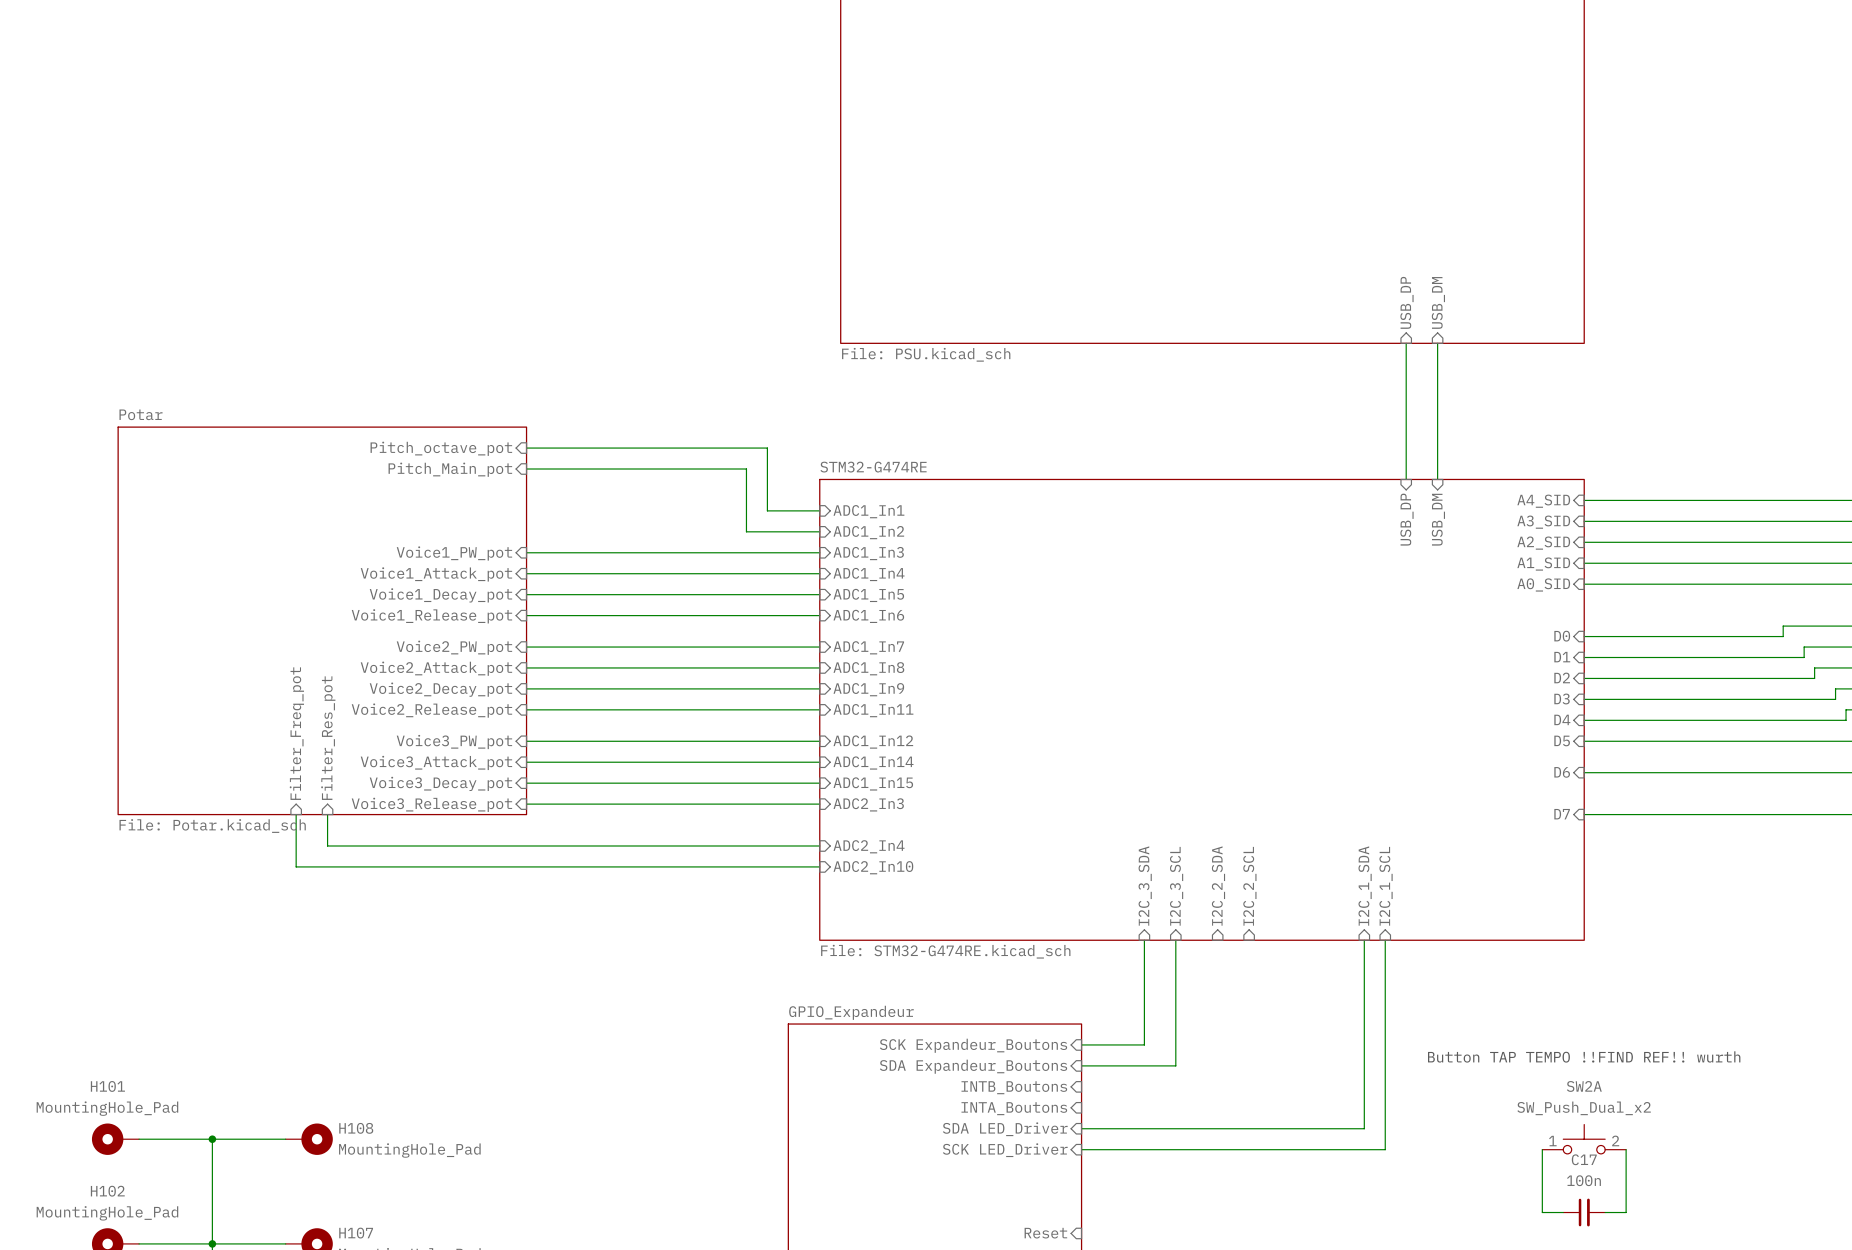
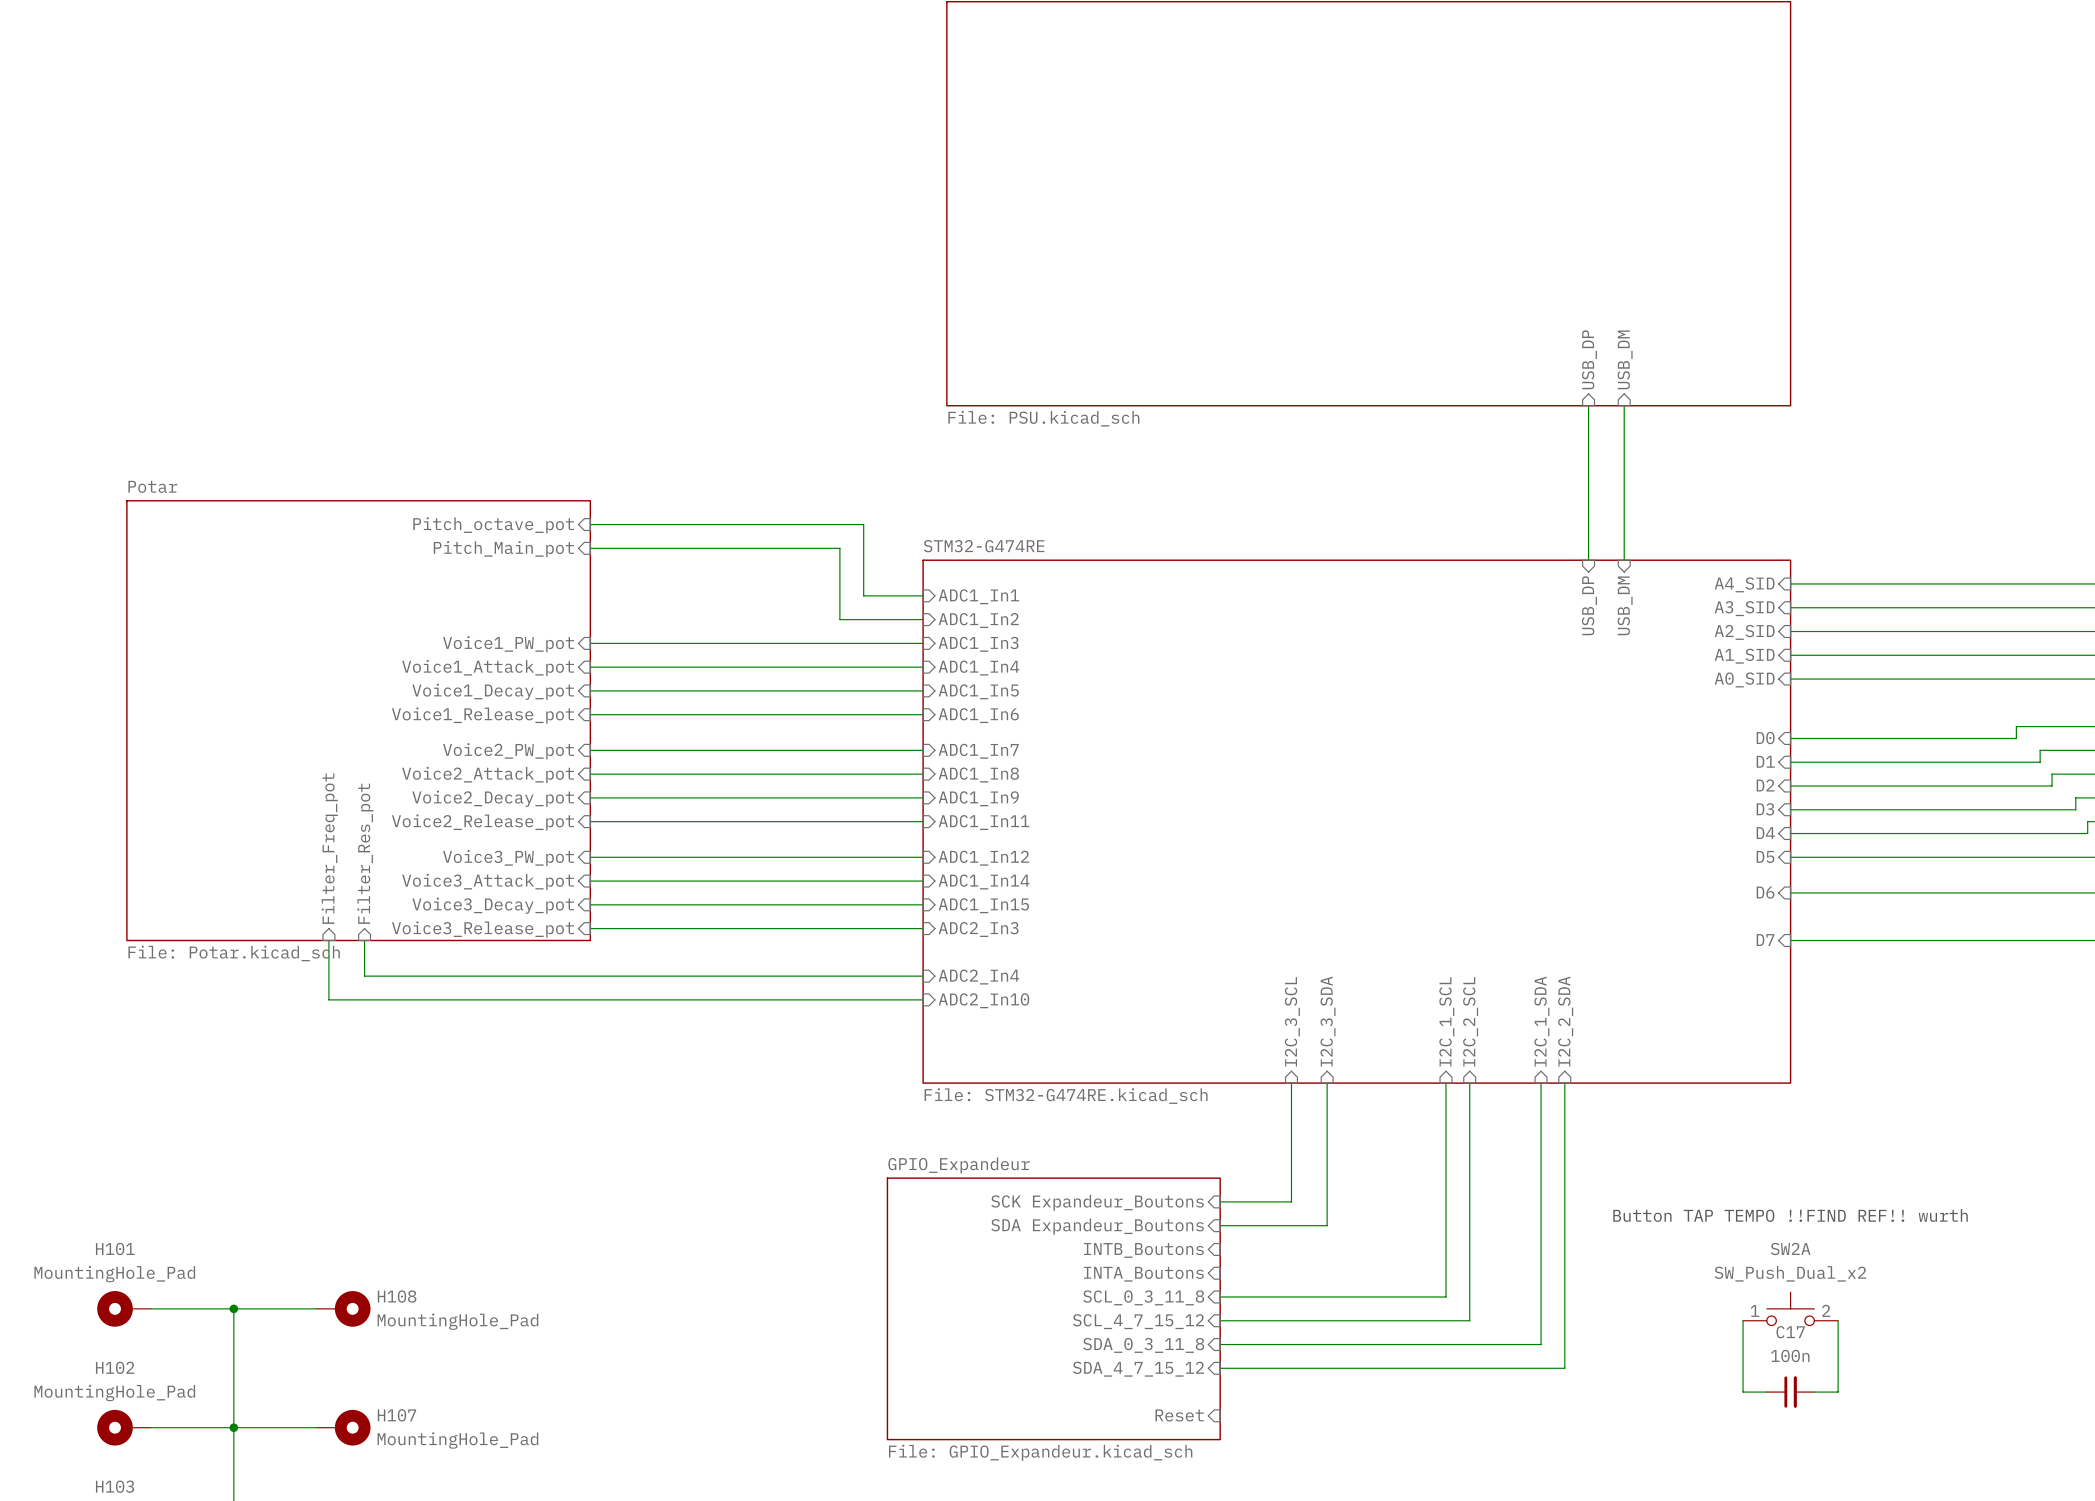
sheet pin: I2C_3_SDA (1145, 886) -> I2C_3_SCL (1292, 1021)
sheet pin: I2C_3_SCL (1176, 886) -> I2C_3_SDA (1328, 1021)
sheet pin: I2C_2_SDA (1218, 886) -> none
sheet pin position: I2C_2_SCL (1249, 886) -> I2C_2_SCL (1470, 1021)
sheet pin: none -> I2C_1_SCL (1446, 1021)
sheet pin: I2C_1_SCL (1386, 886) -> I2C_2_SDA (1565, 1021)
wire: none -> (1445, 1083) (1445, 1296)
wire: none -> (1469, 1083) (1469, 1320)
wire: (1280, 1128) (1364, 1128) -> (1220, 1344) (1541, 1344) (1541, 1296)
sheet pin: SDA LED_Driver (1005, 1129) -> SCL_0_3_11_8 (1143, 1297)
wire: (1301, 1149) (1385, 1149) -> (1220, 1368) (1564, 1368) (1564, 1320)
sheet pin: SCK LED_Driver (1005, 1150) -> SCL_4_7_15_12 (1138, 1321)
sheet pin: none -> SDA_0_3_11_8 (1143, 1345)
sheet pin: none -> SDA_4_7_15_12 (1138, 1369)

